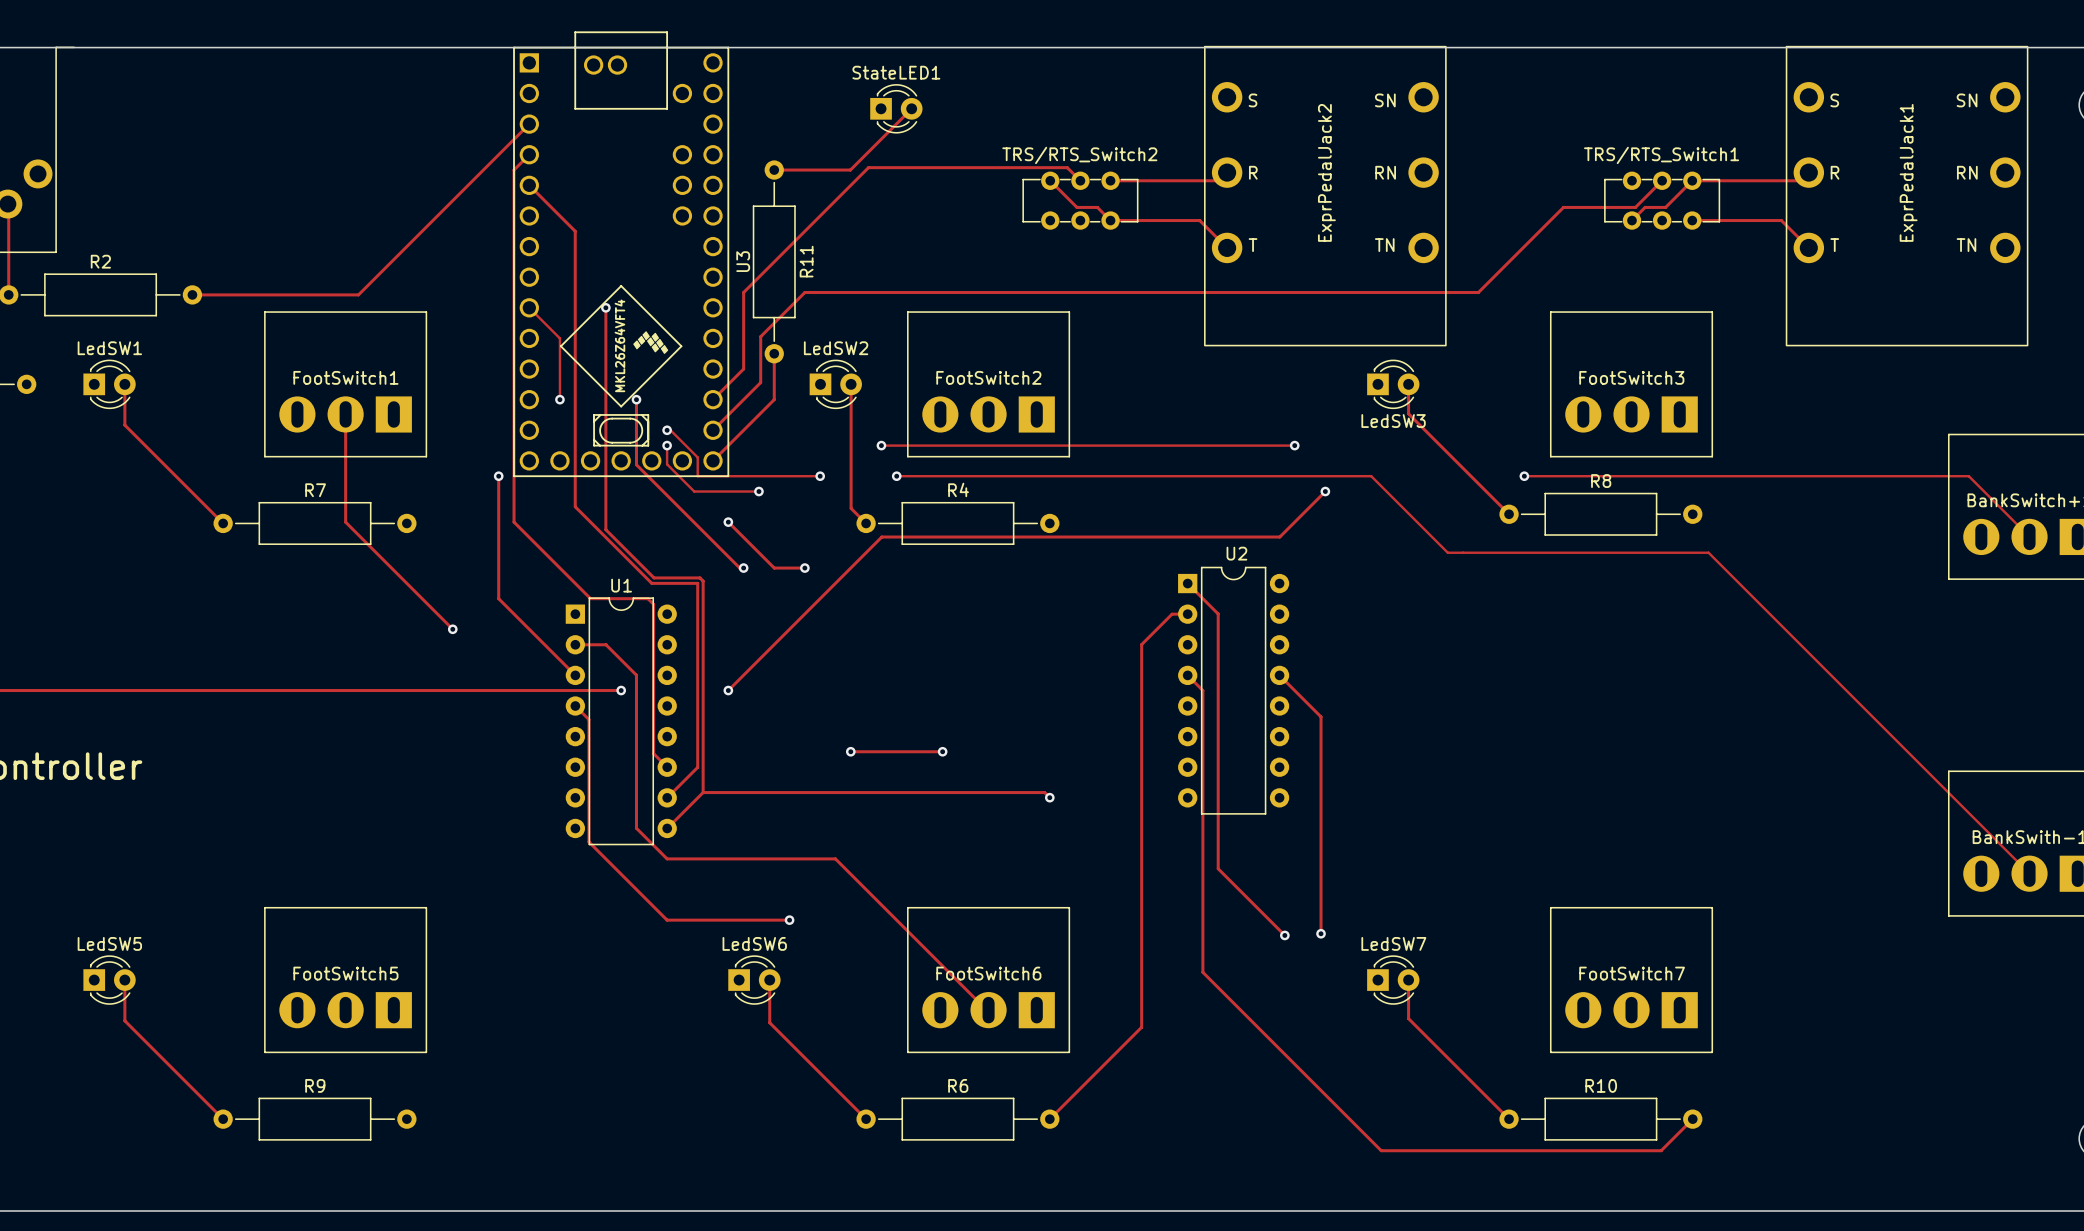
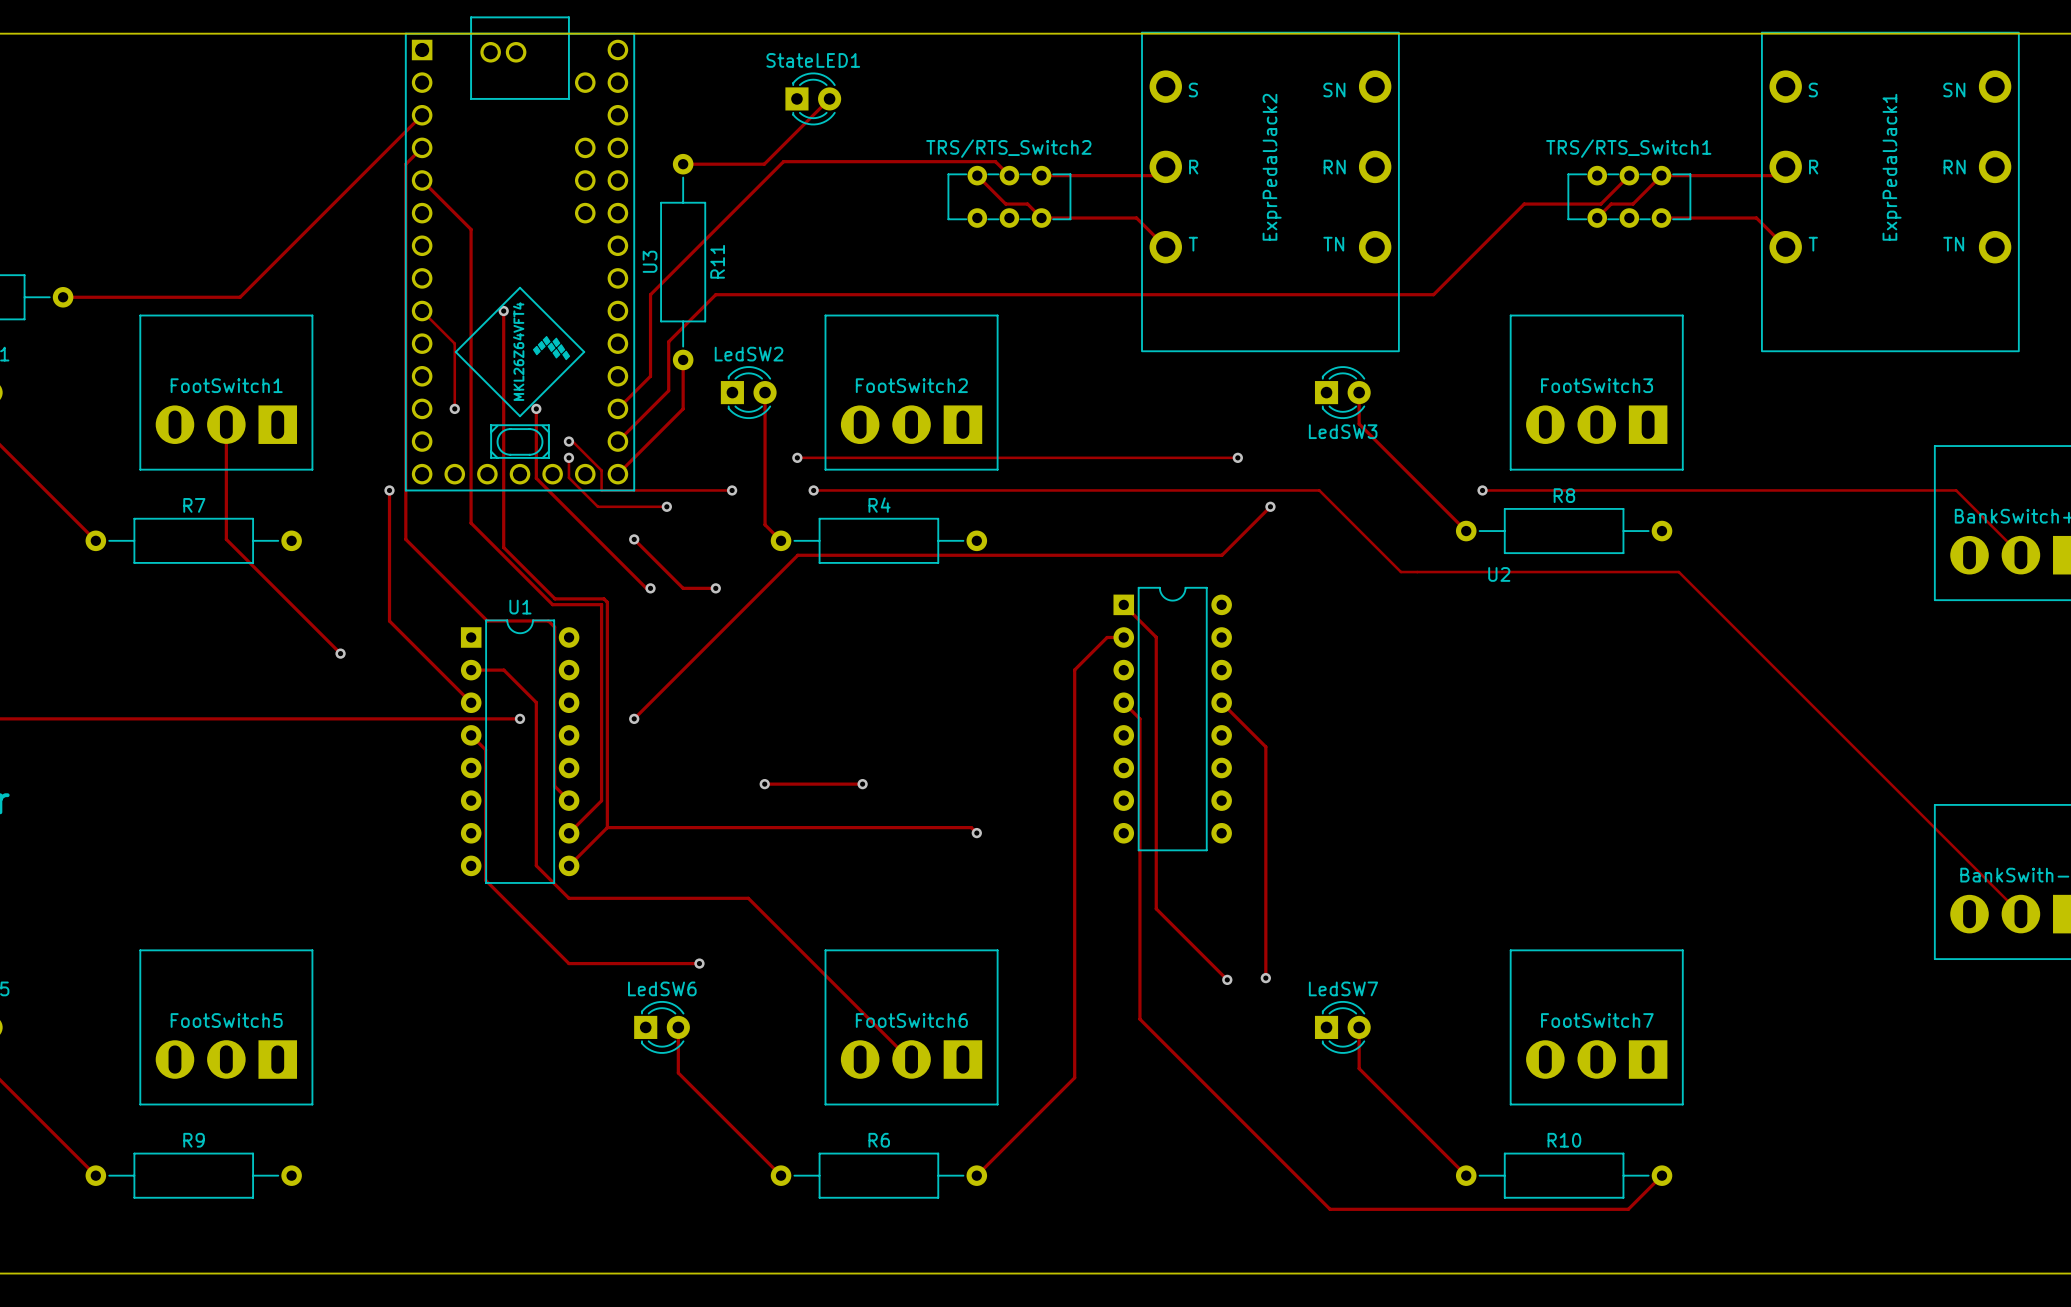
U2 name position: U2 (1236, 553) -> U2 (1499, 574)

